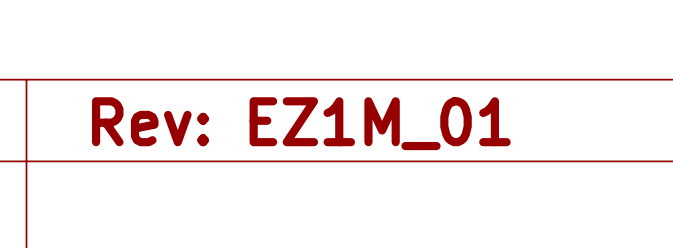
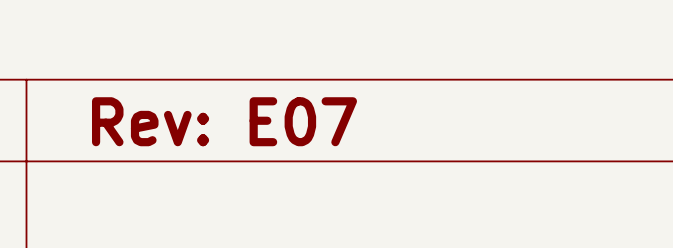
title block: Rev: EZ1M_01 (301, 123) -> Rev: E07 (224, 121)

